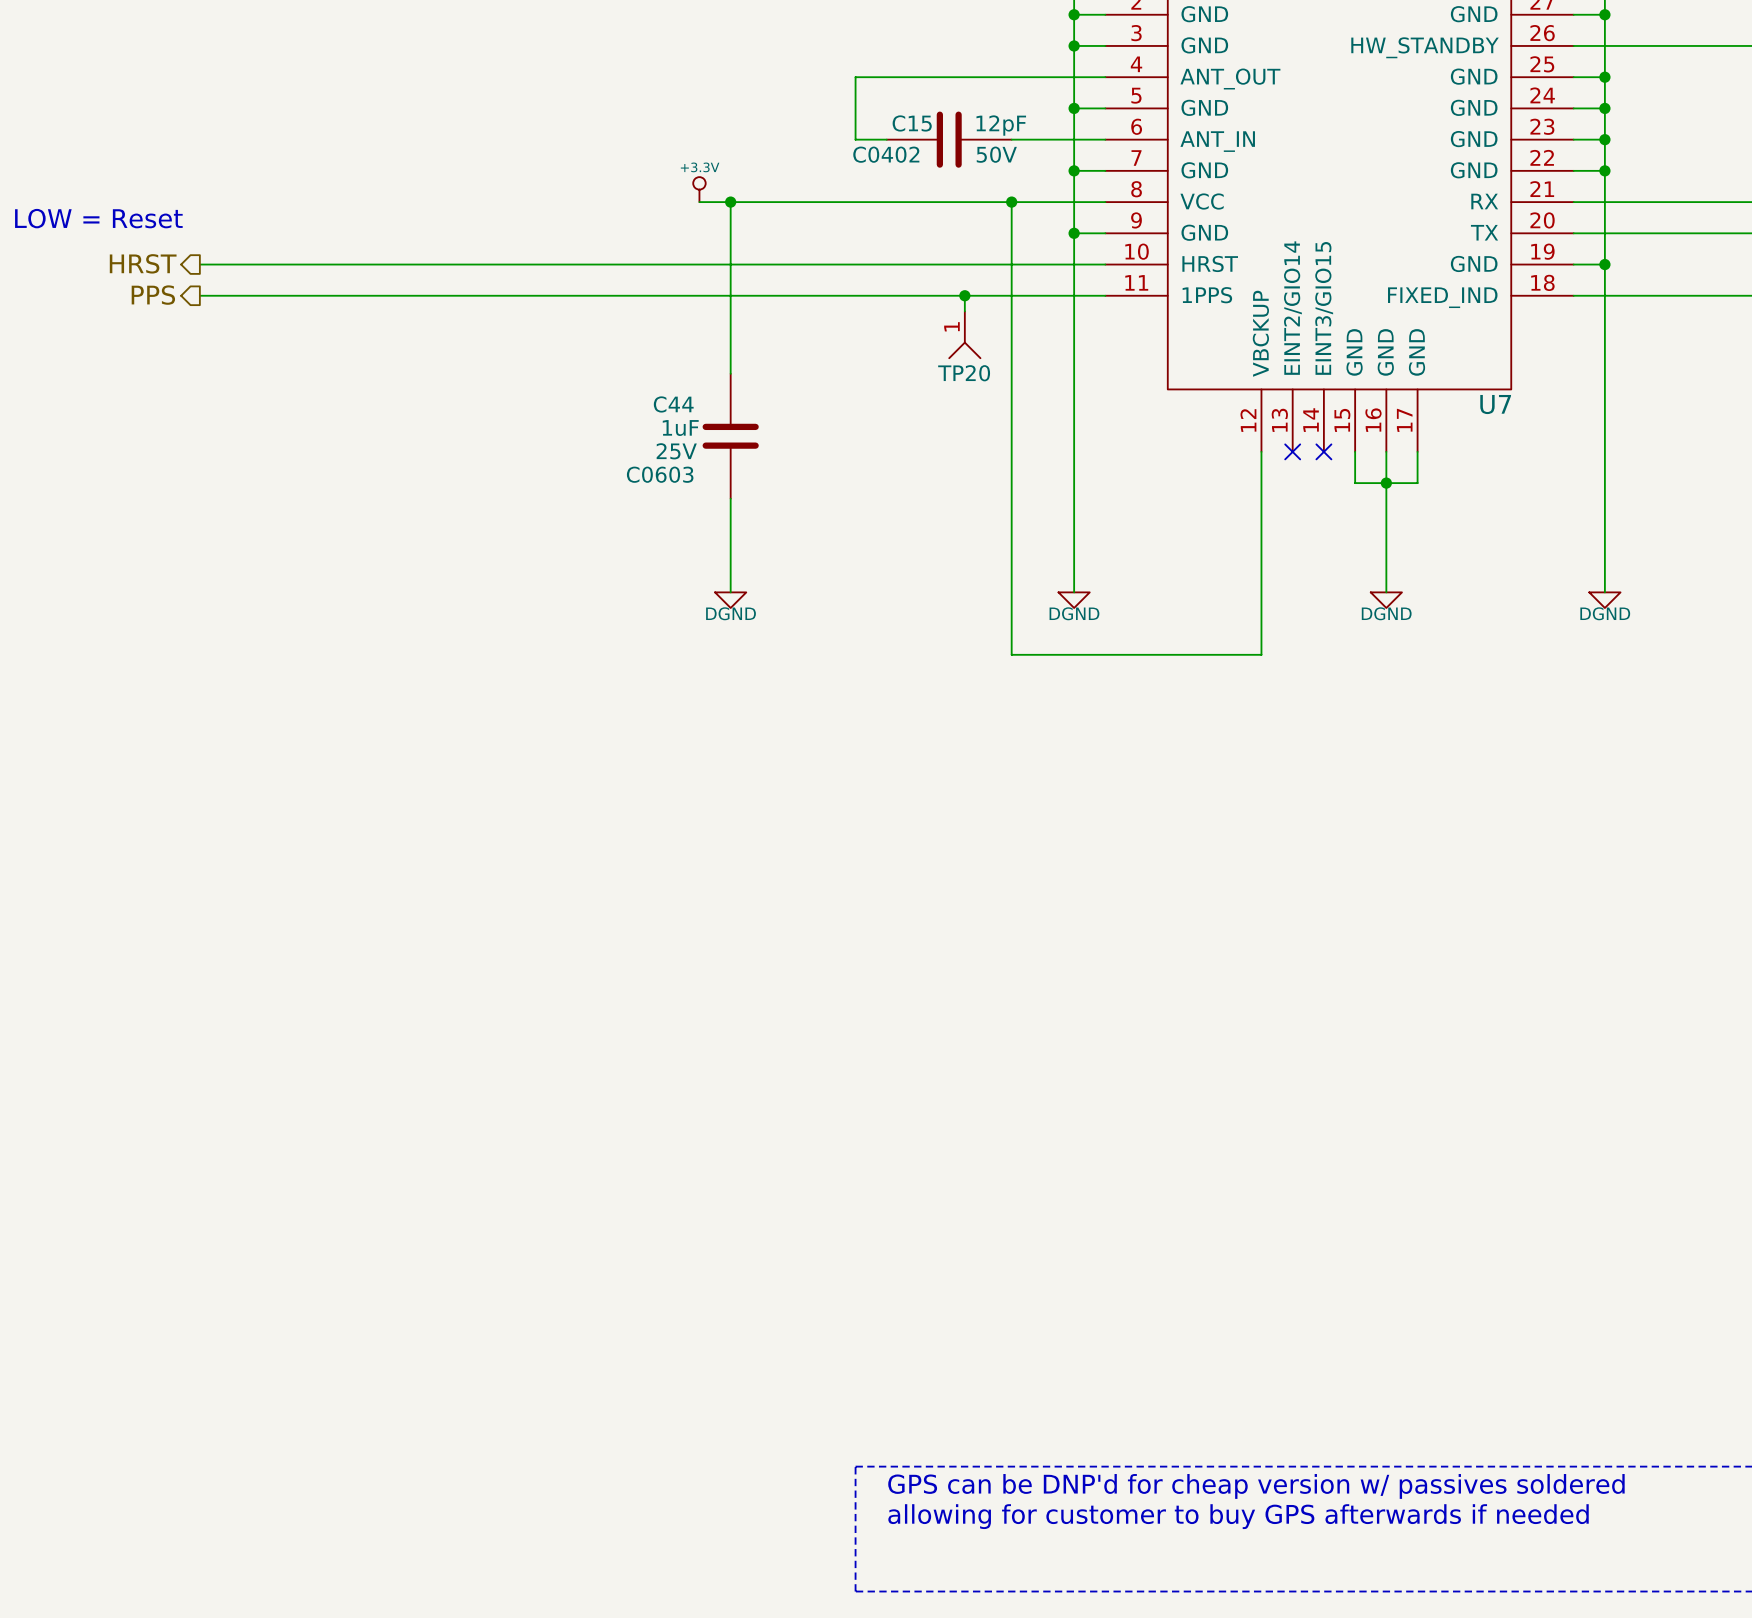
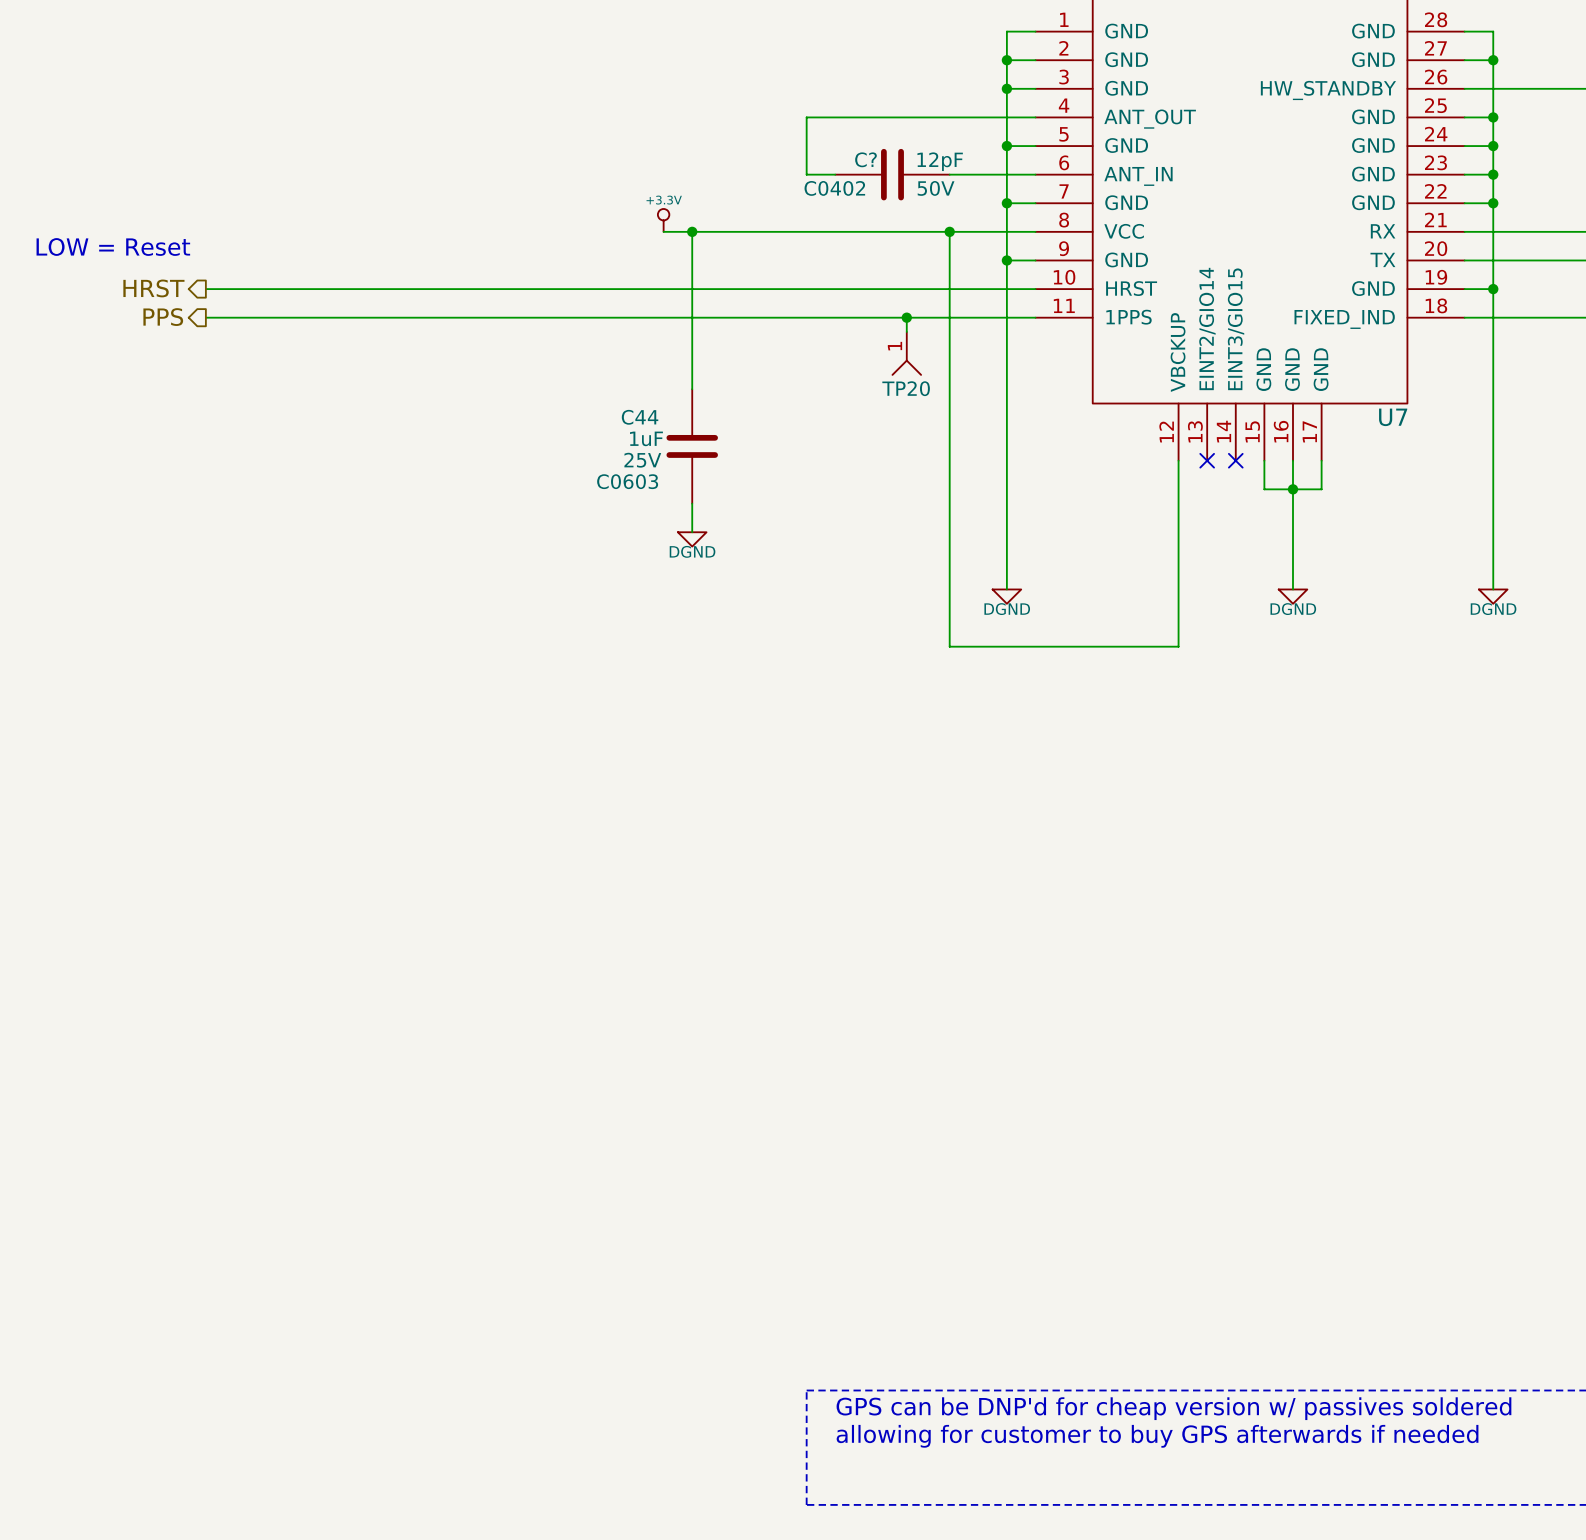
C15 name: C15 (912, 123) -> C? (865, 159)
wire: (730, 529) (730, 592) -> none
power symbol position: DGND (730, 600) -> DGND (692, 539)

